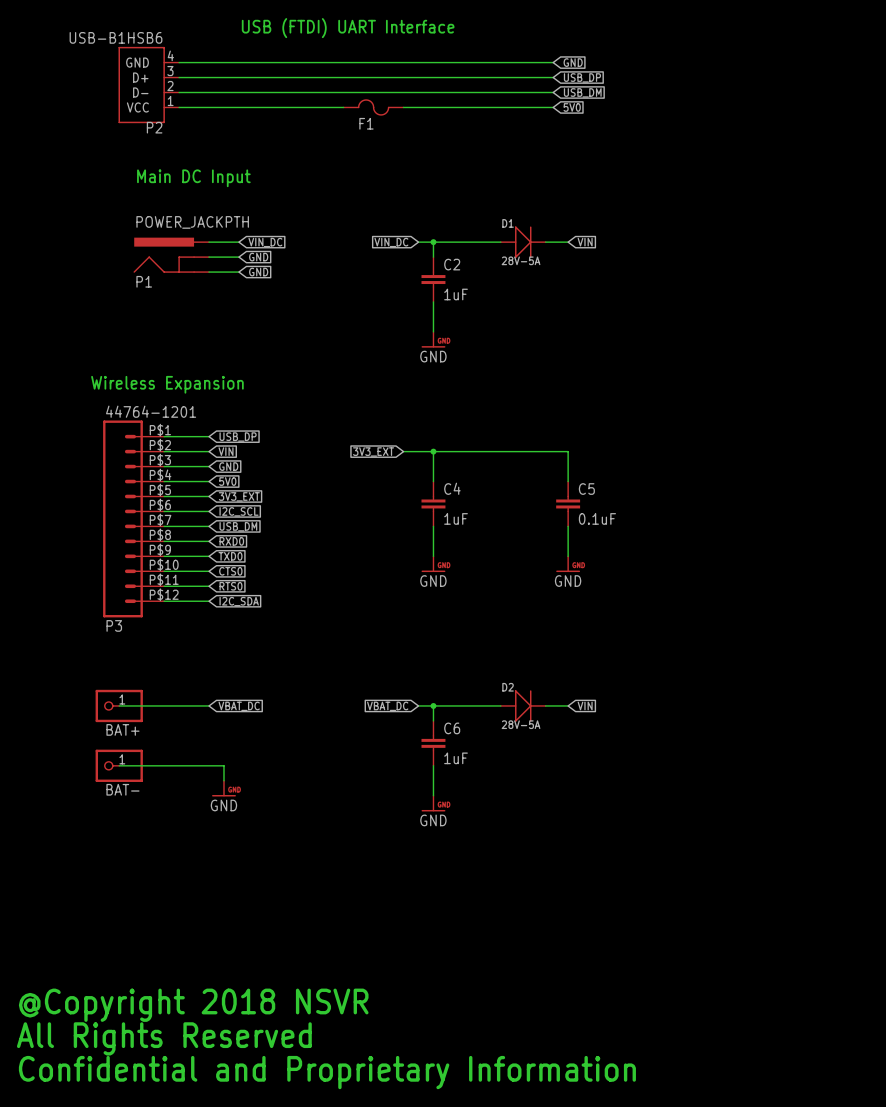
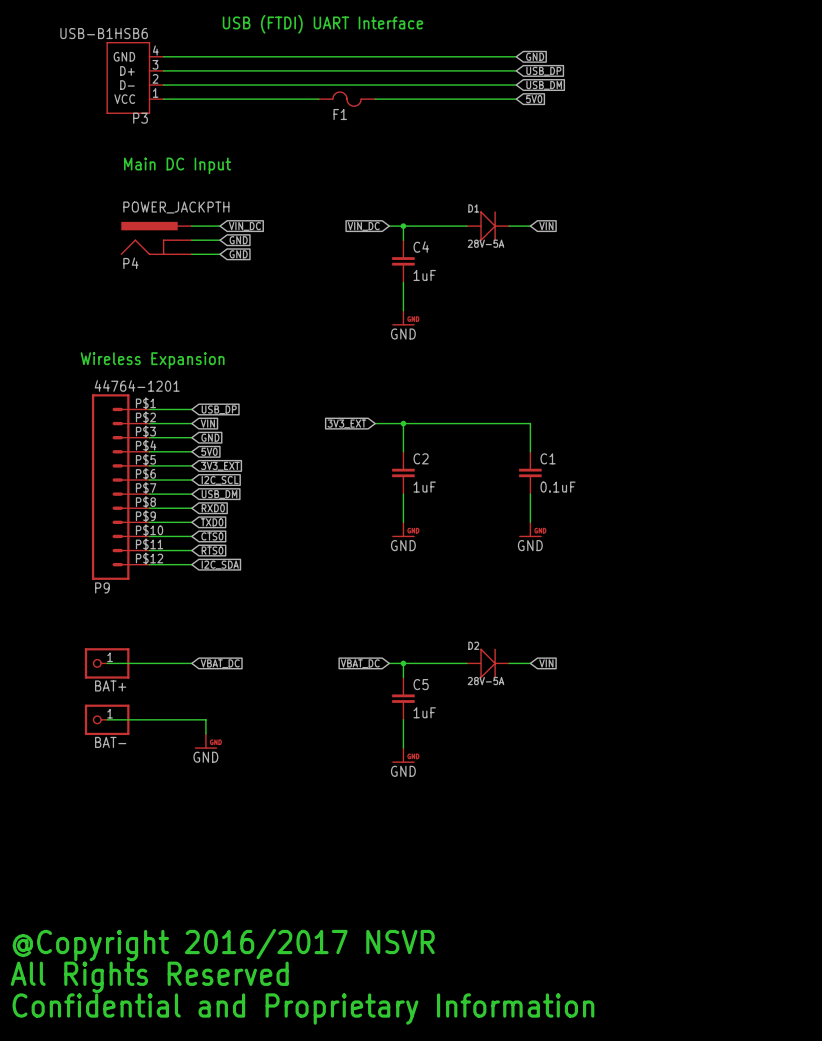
P2 name: P2 (154, 127) -> P3 (140, 118)
C2 name: C2 (452, 264) -> C4 (421, 247)
P1 name: P1 (144, 281) -> P4 (130, 263)
C4 name: C4 (452, 488) -> C2 (421, 458)
C5 name: C5 (586, 489) -> C1 (548, 458)
P3 name: P3 (114, 625) -> P9 (102, 587)
C6 name: C6 (452, 728) -> C5 (421, 684)
text: @Copyright 2018 NSVR (193, 1005) -> @Copyright 2016/2017 NSVR (223, 945)

